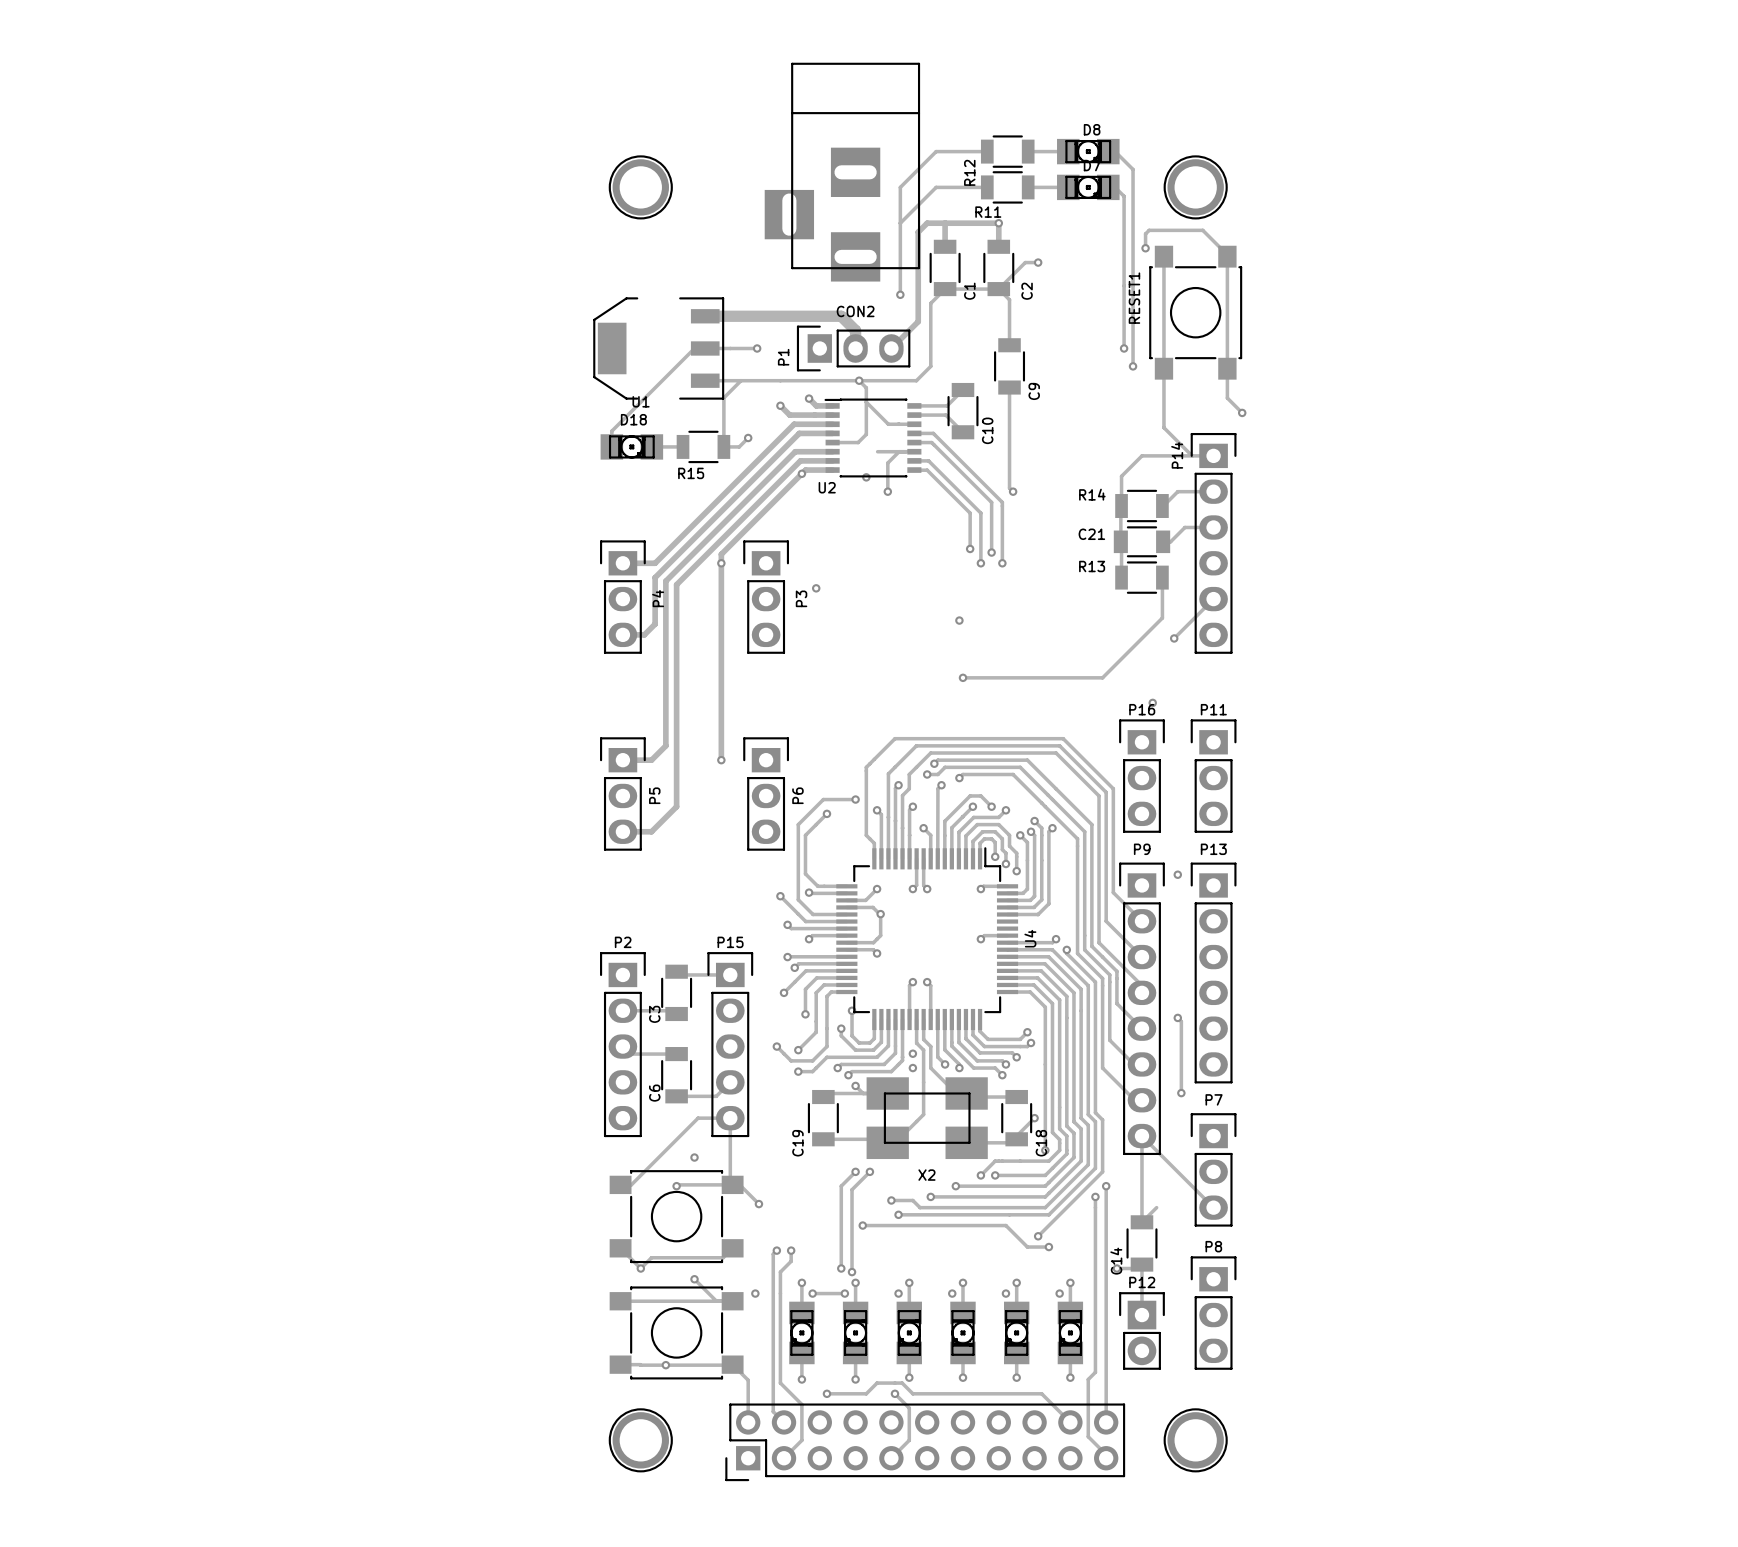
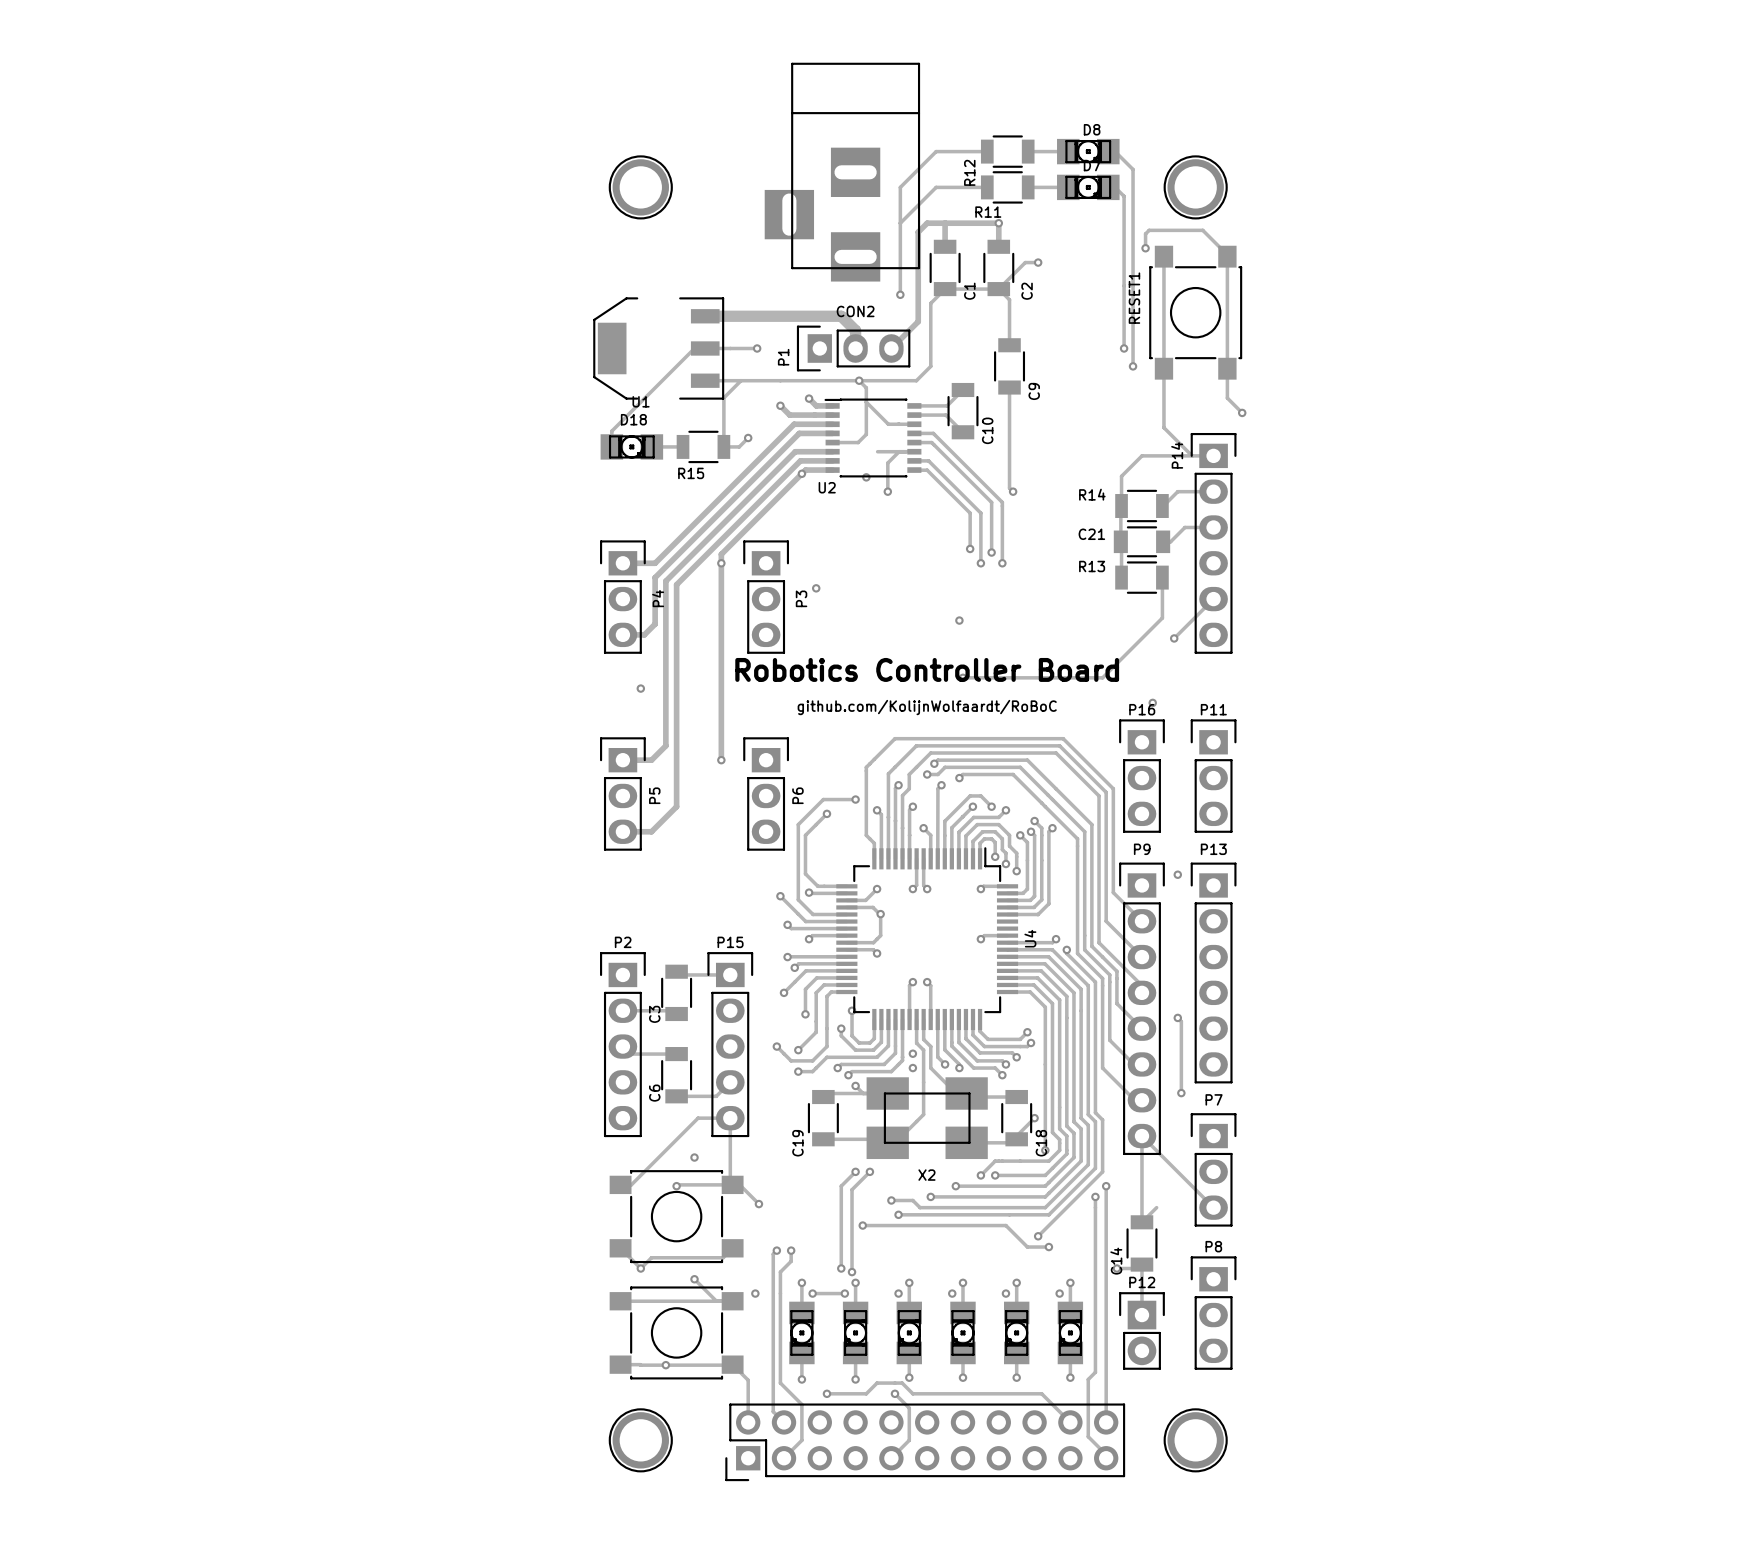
text: none -> Robotics Controller Board (927, 669)
via: none -> (640, 688)
text: none -> github.com/KolijnWolfaardt/RoBoC (927, 707)

